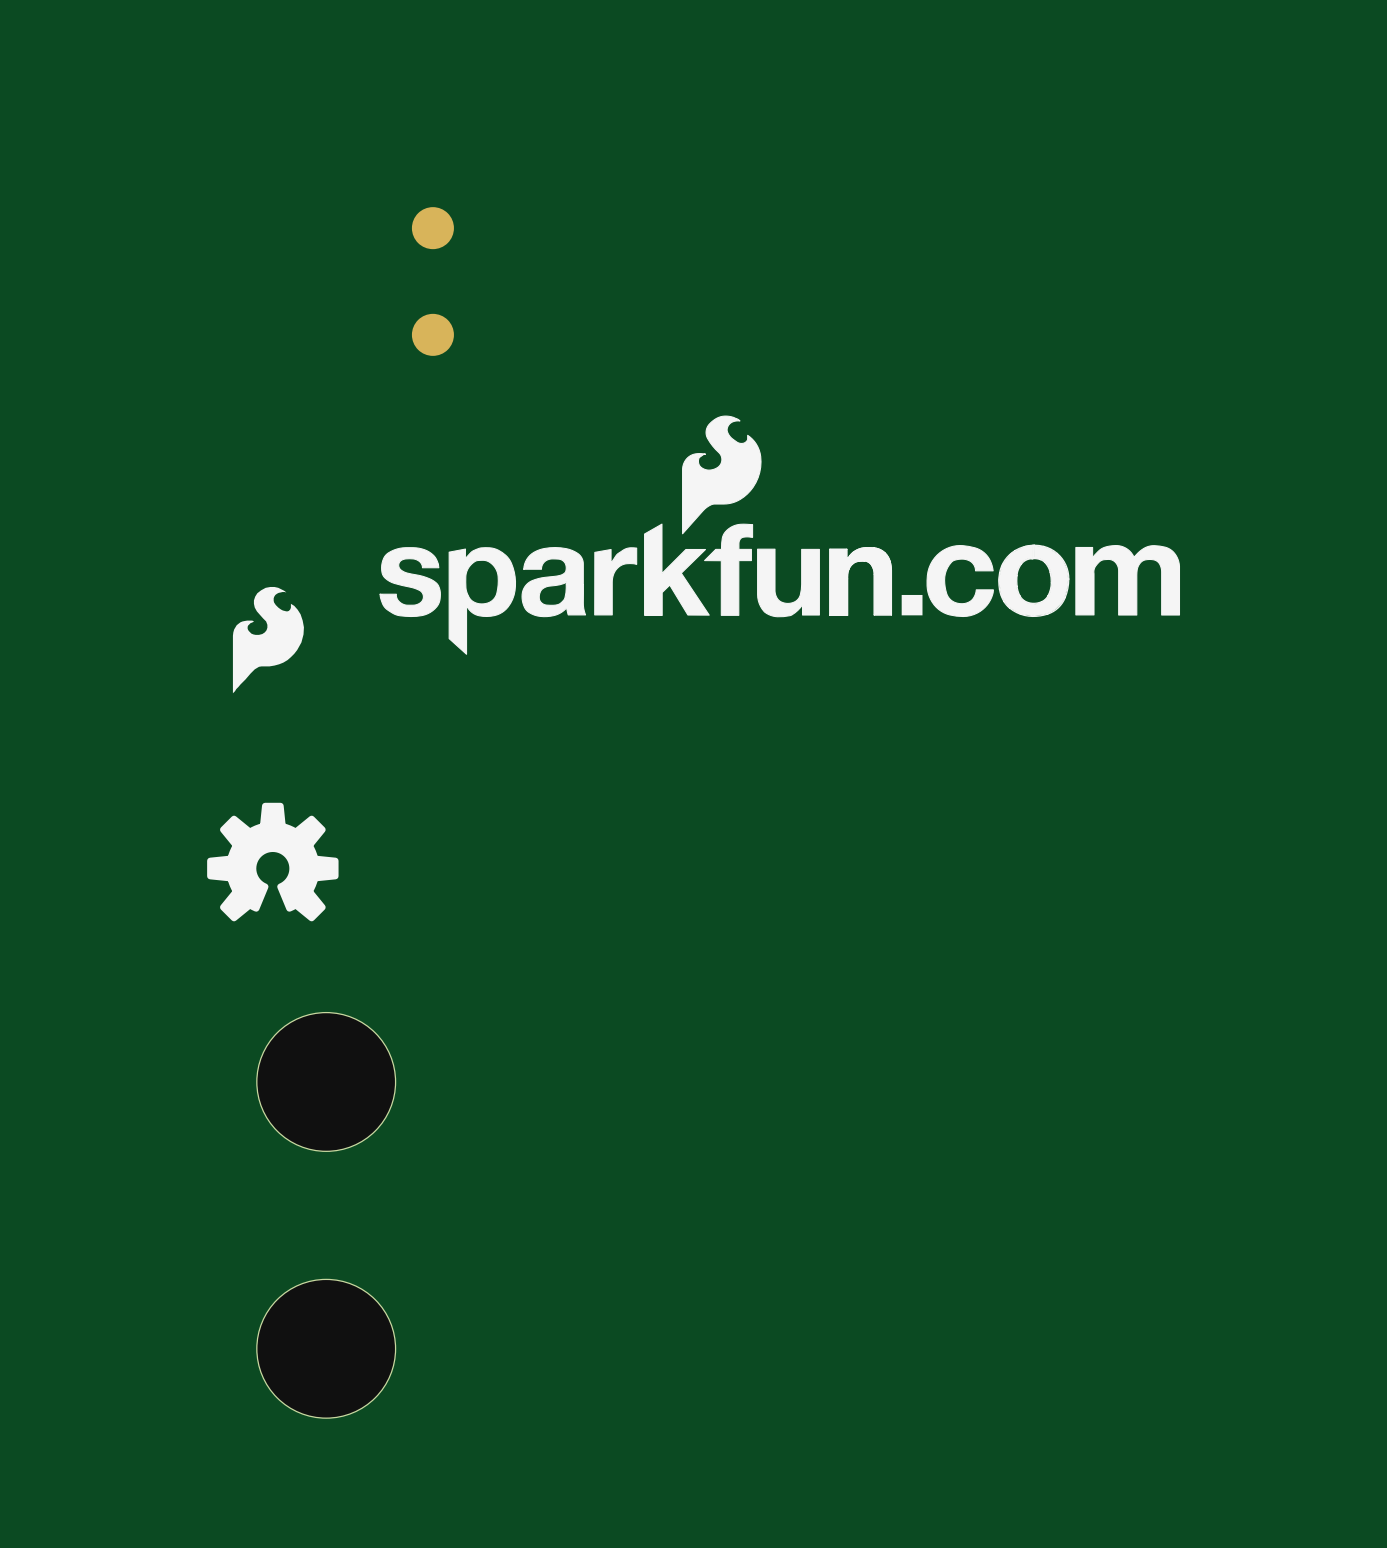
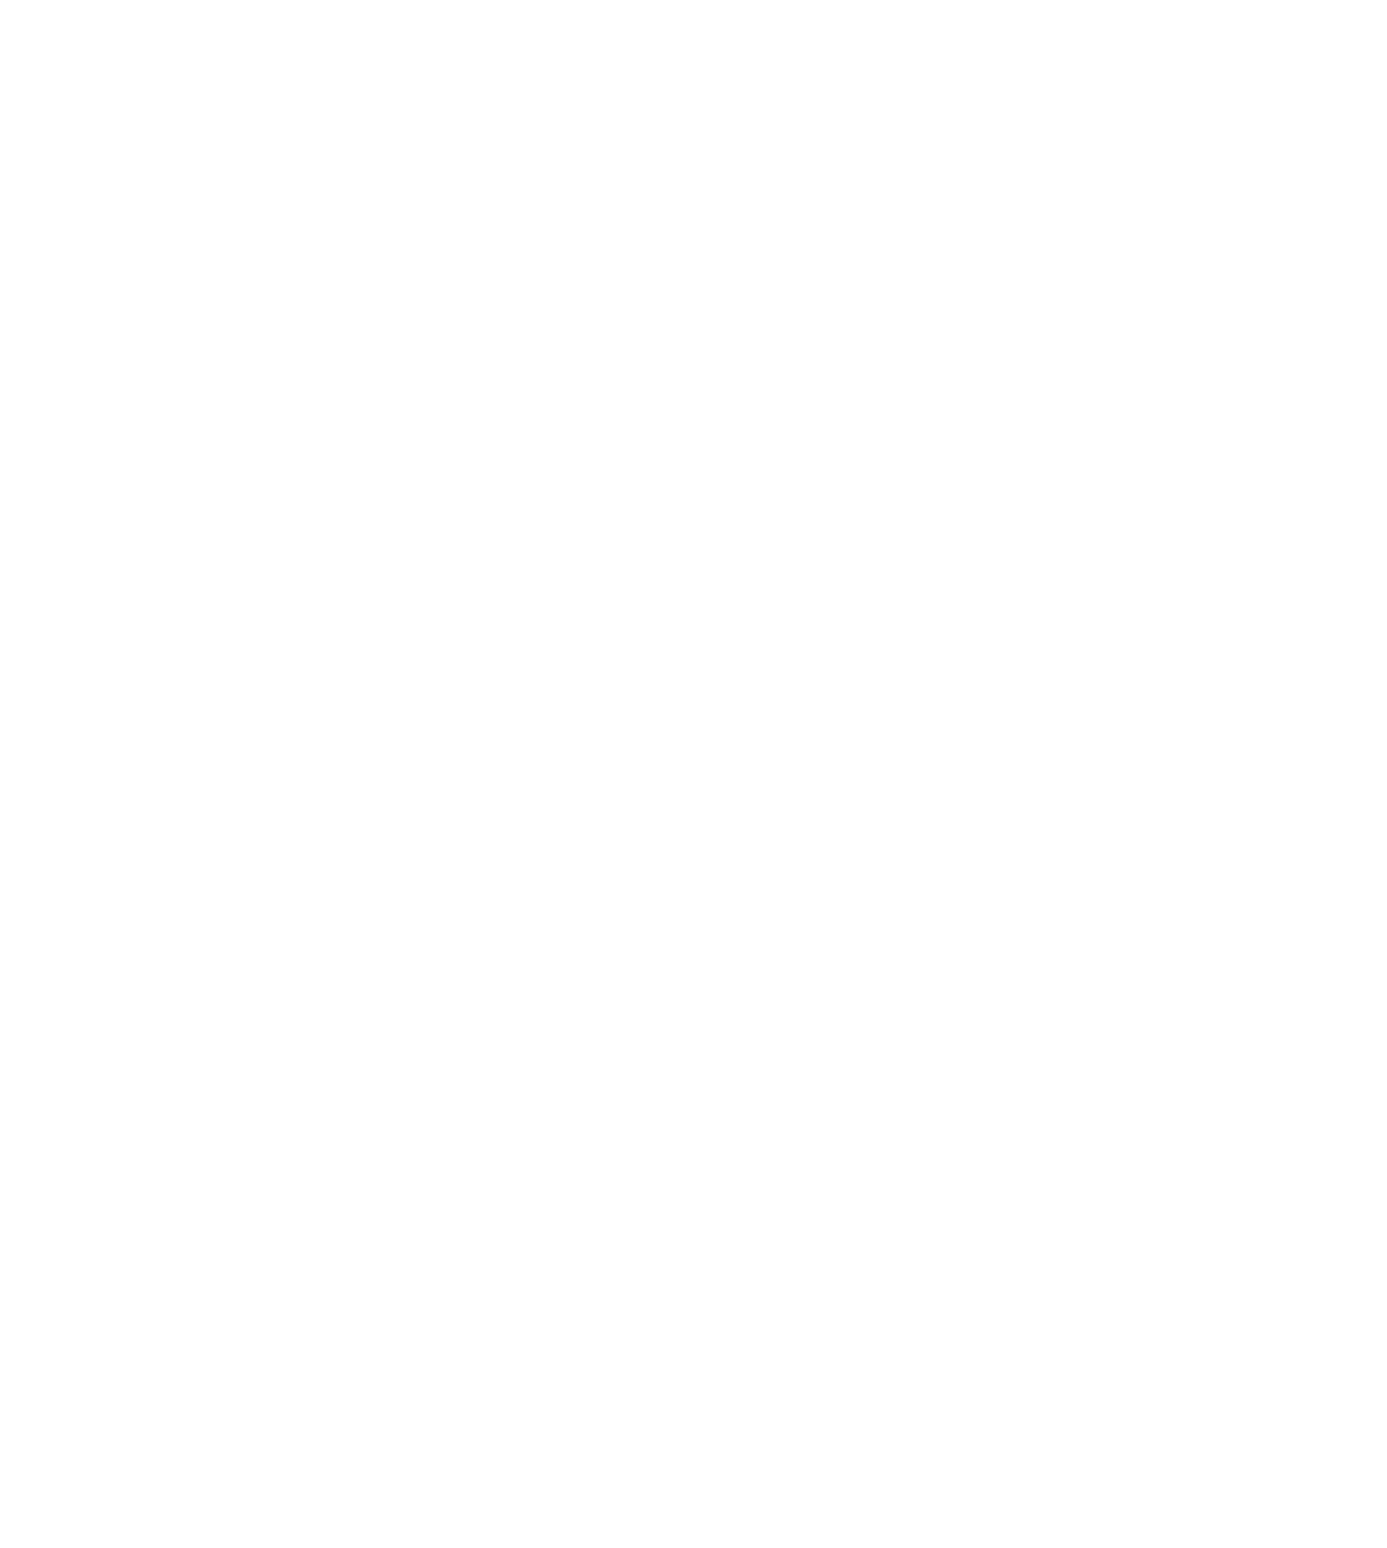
part: (432, 228) -> none
part: (432, 334) -> none
drawing: [379, 415, 1181, 655] -> none
drawing: [232, 586, 304, 694] -> none
drawing: [207, 802, 339, 922] -> none
part: (326, 1081) -> none
part: (326, 1348) -> none

